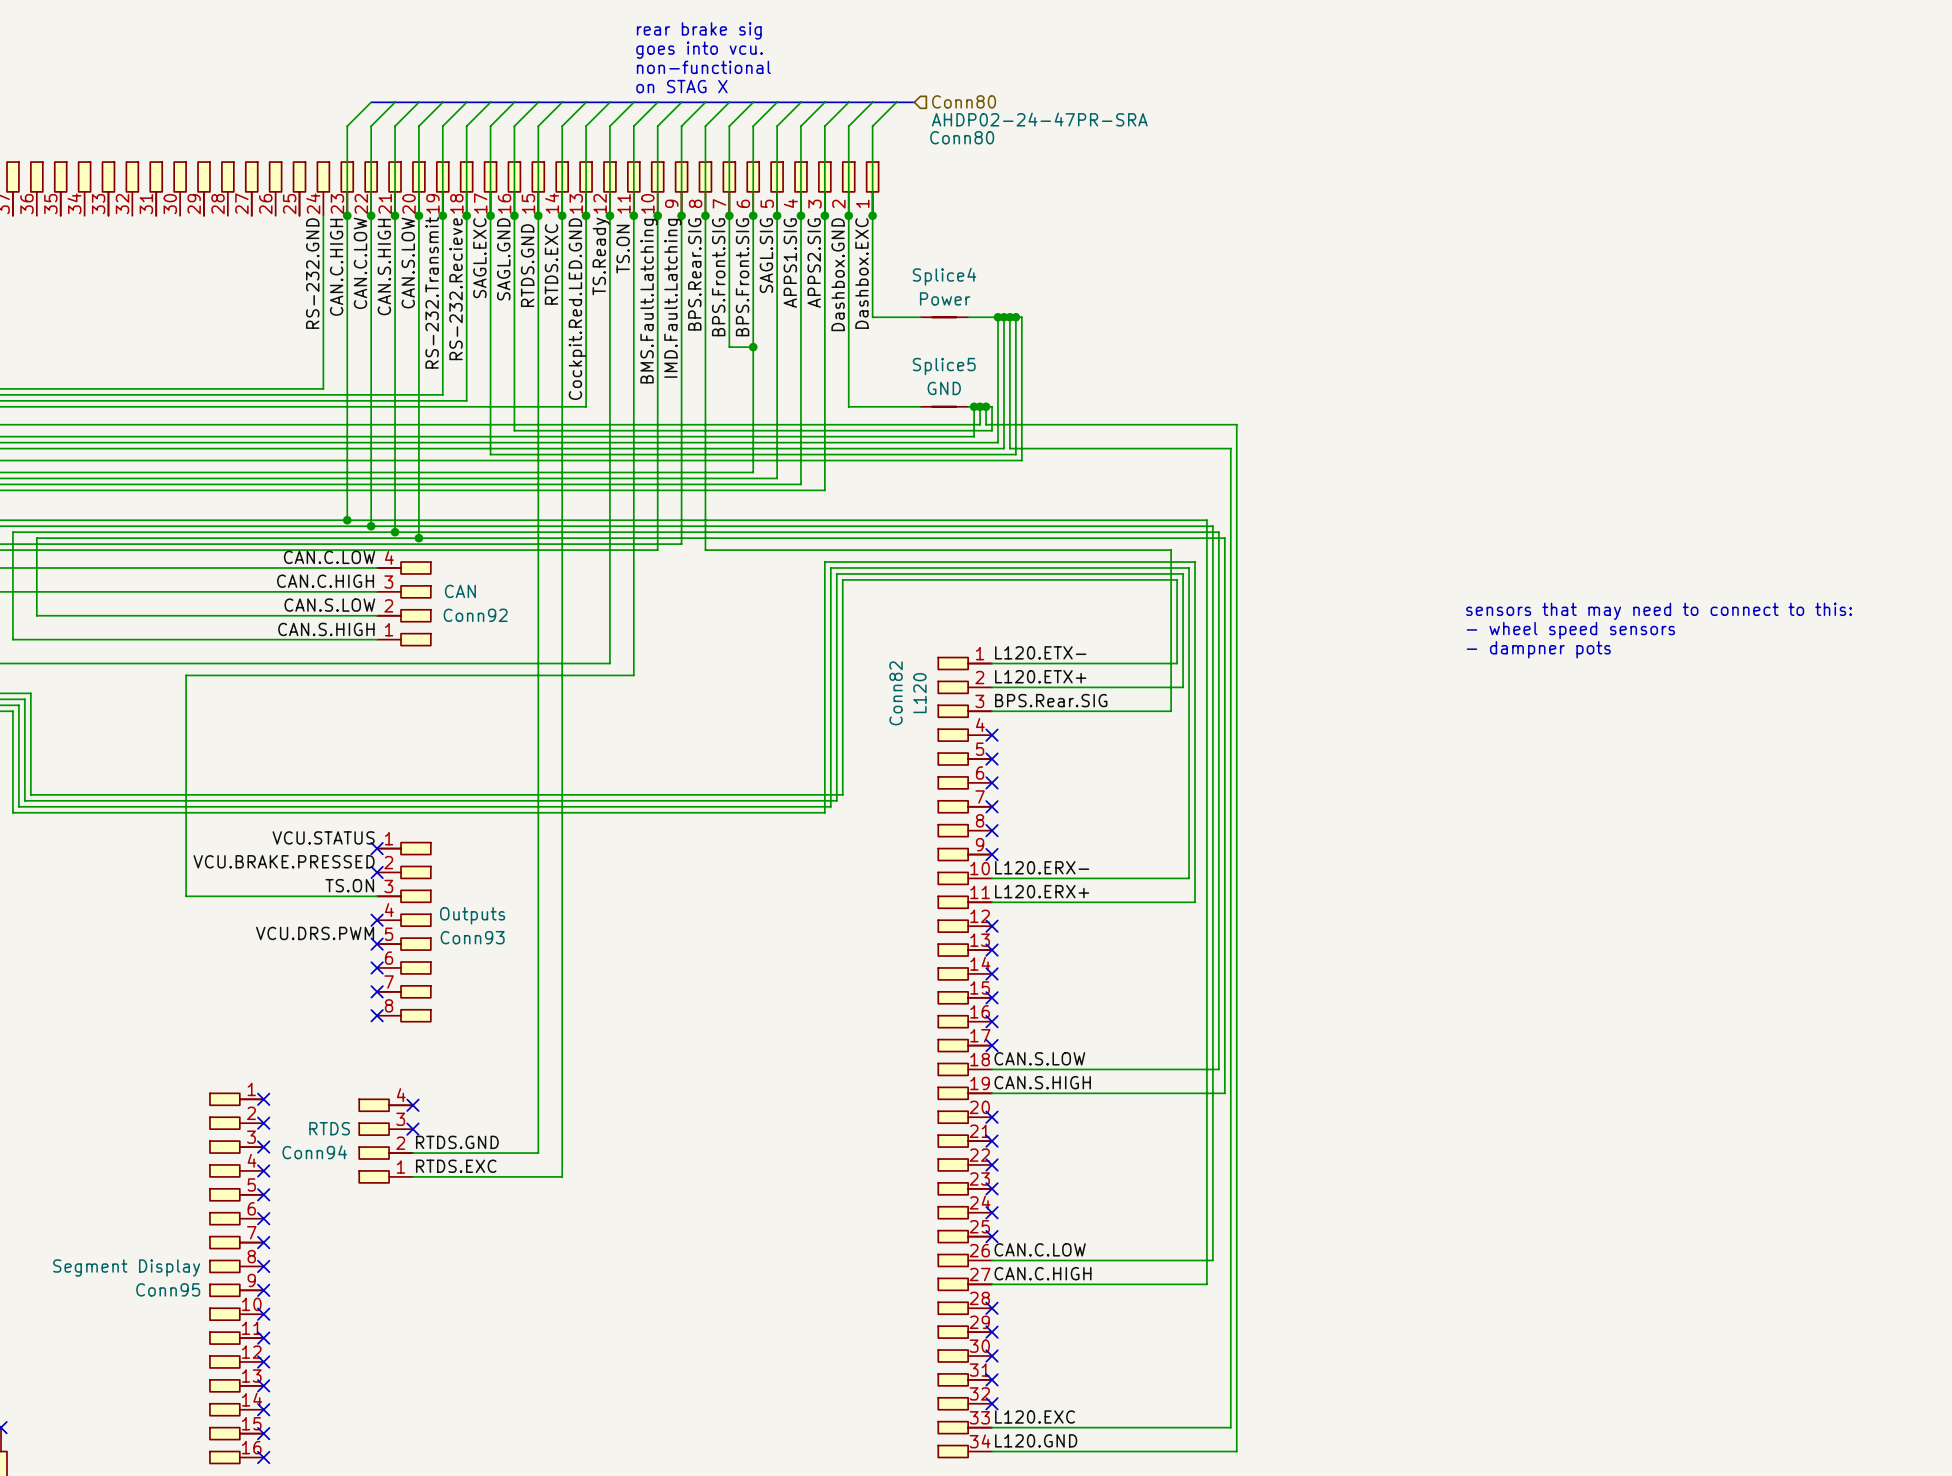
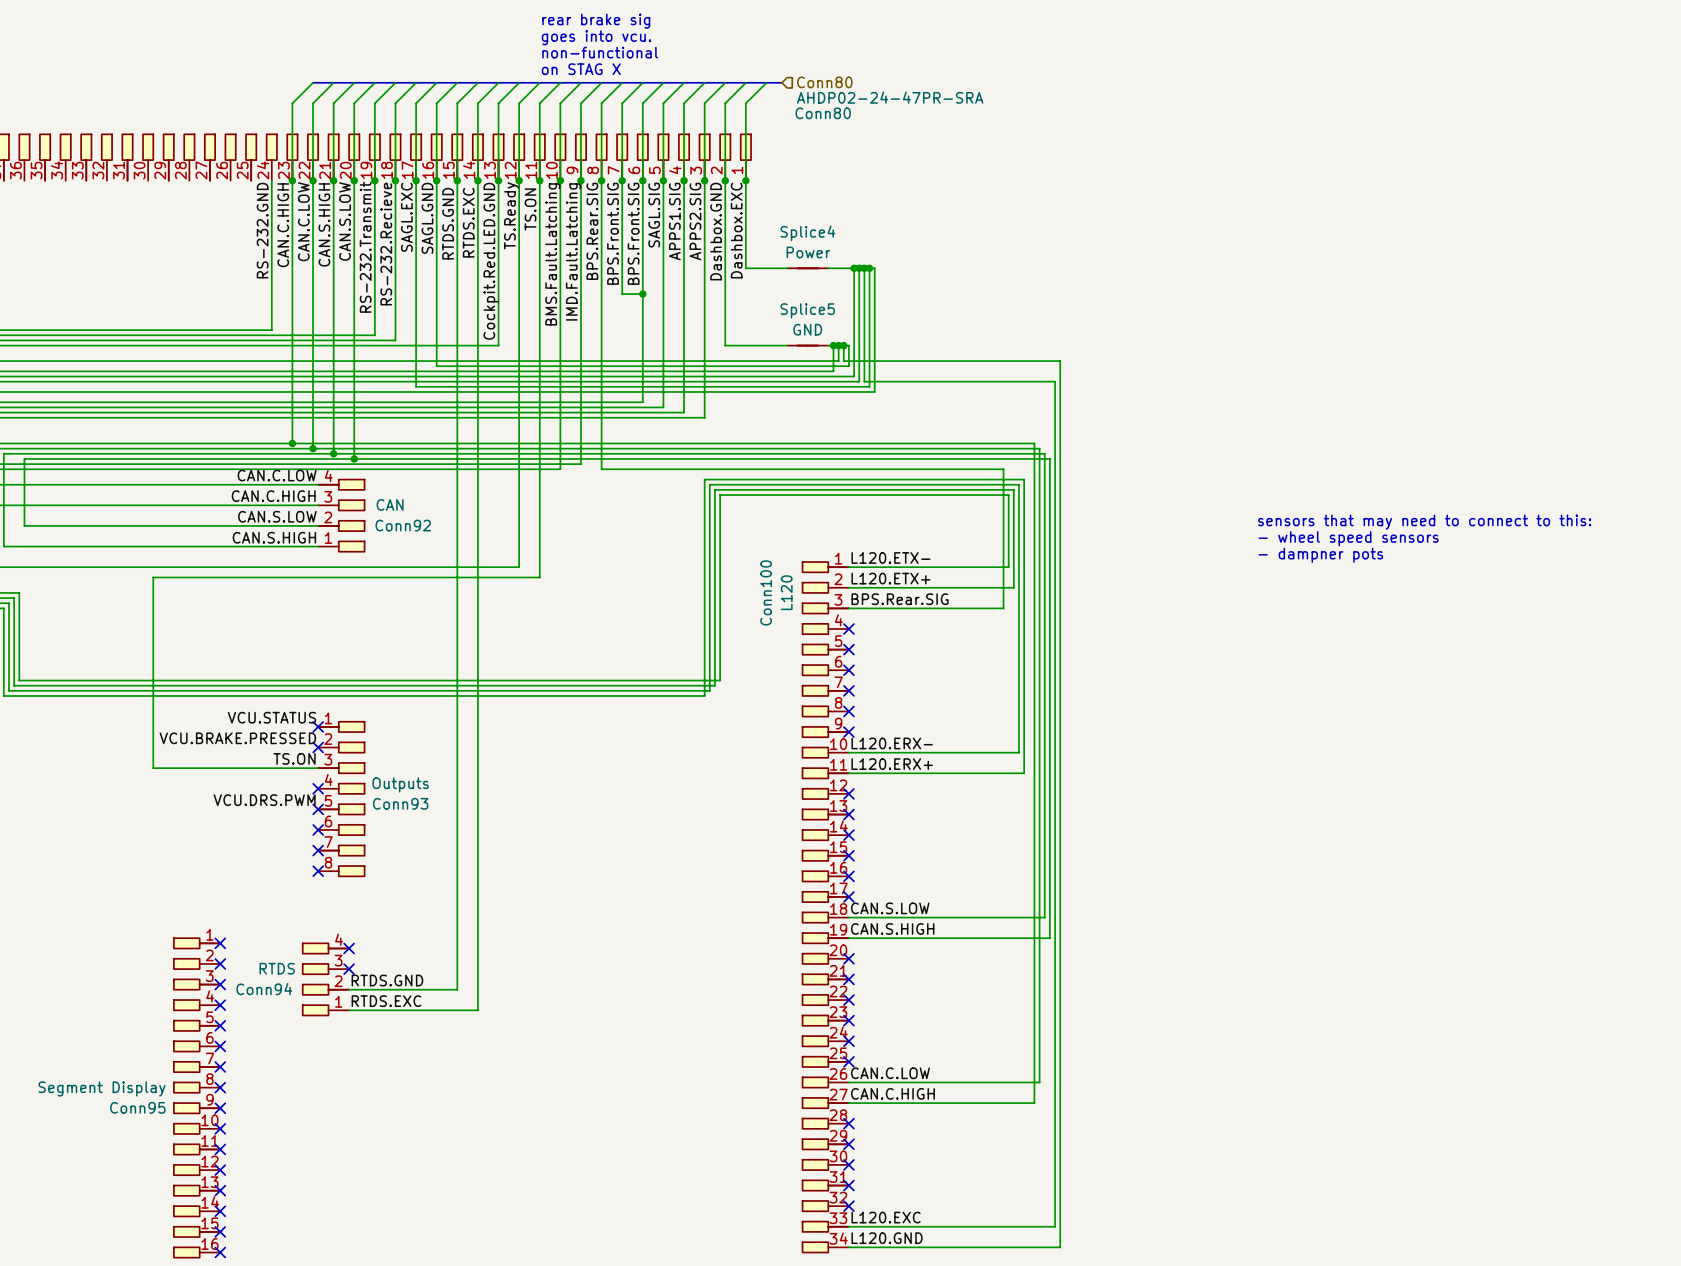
Conn82 name: Conn82 (896, 693) -> Conn100 (766, 592)

